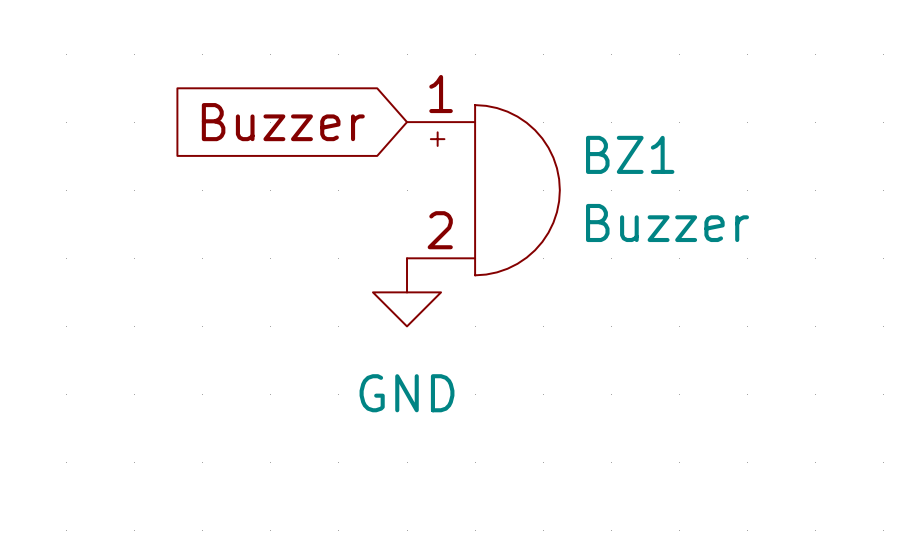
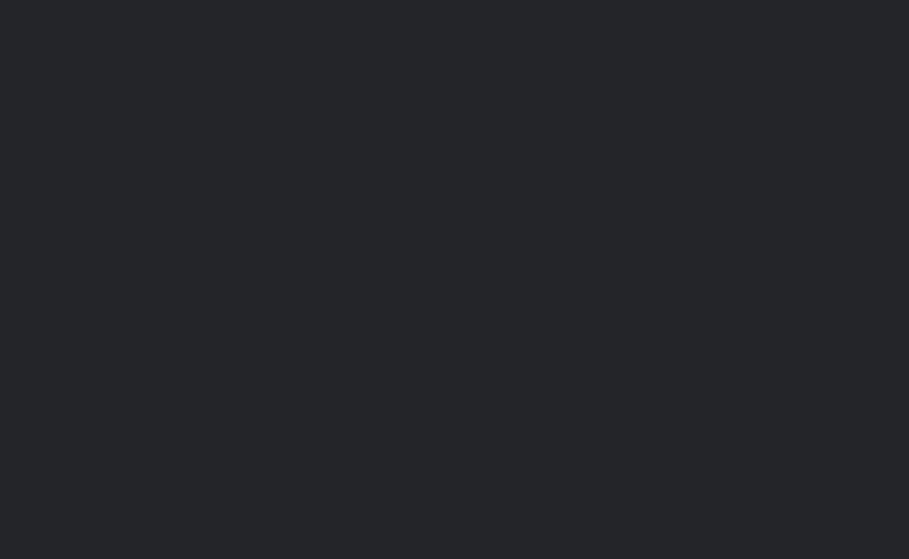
global label: Buzzer (283, 122) -> none
BZ1: Buzzer (483, 190) -> none
power symbol: GND (407, 292) -> none

